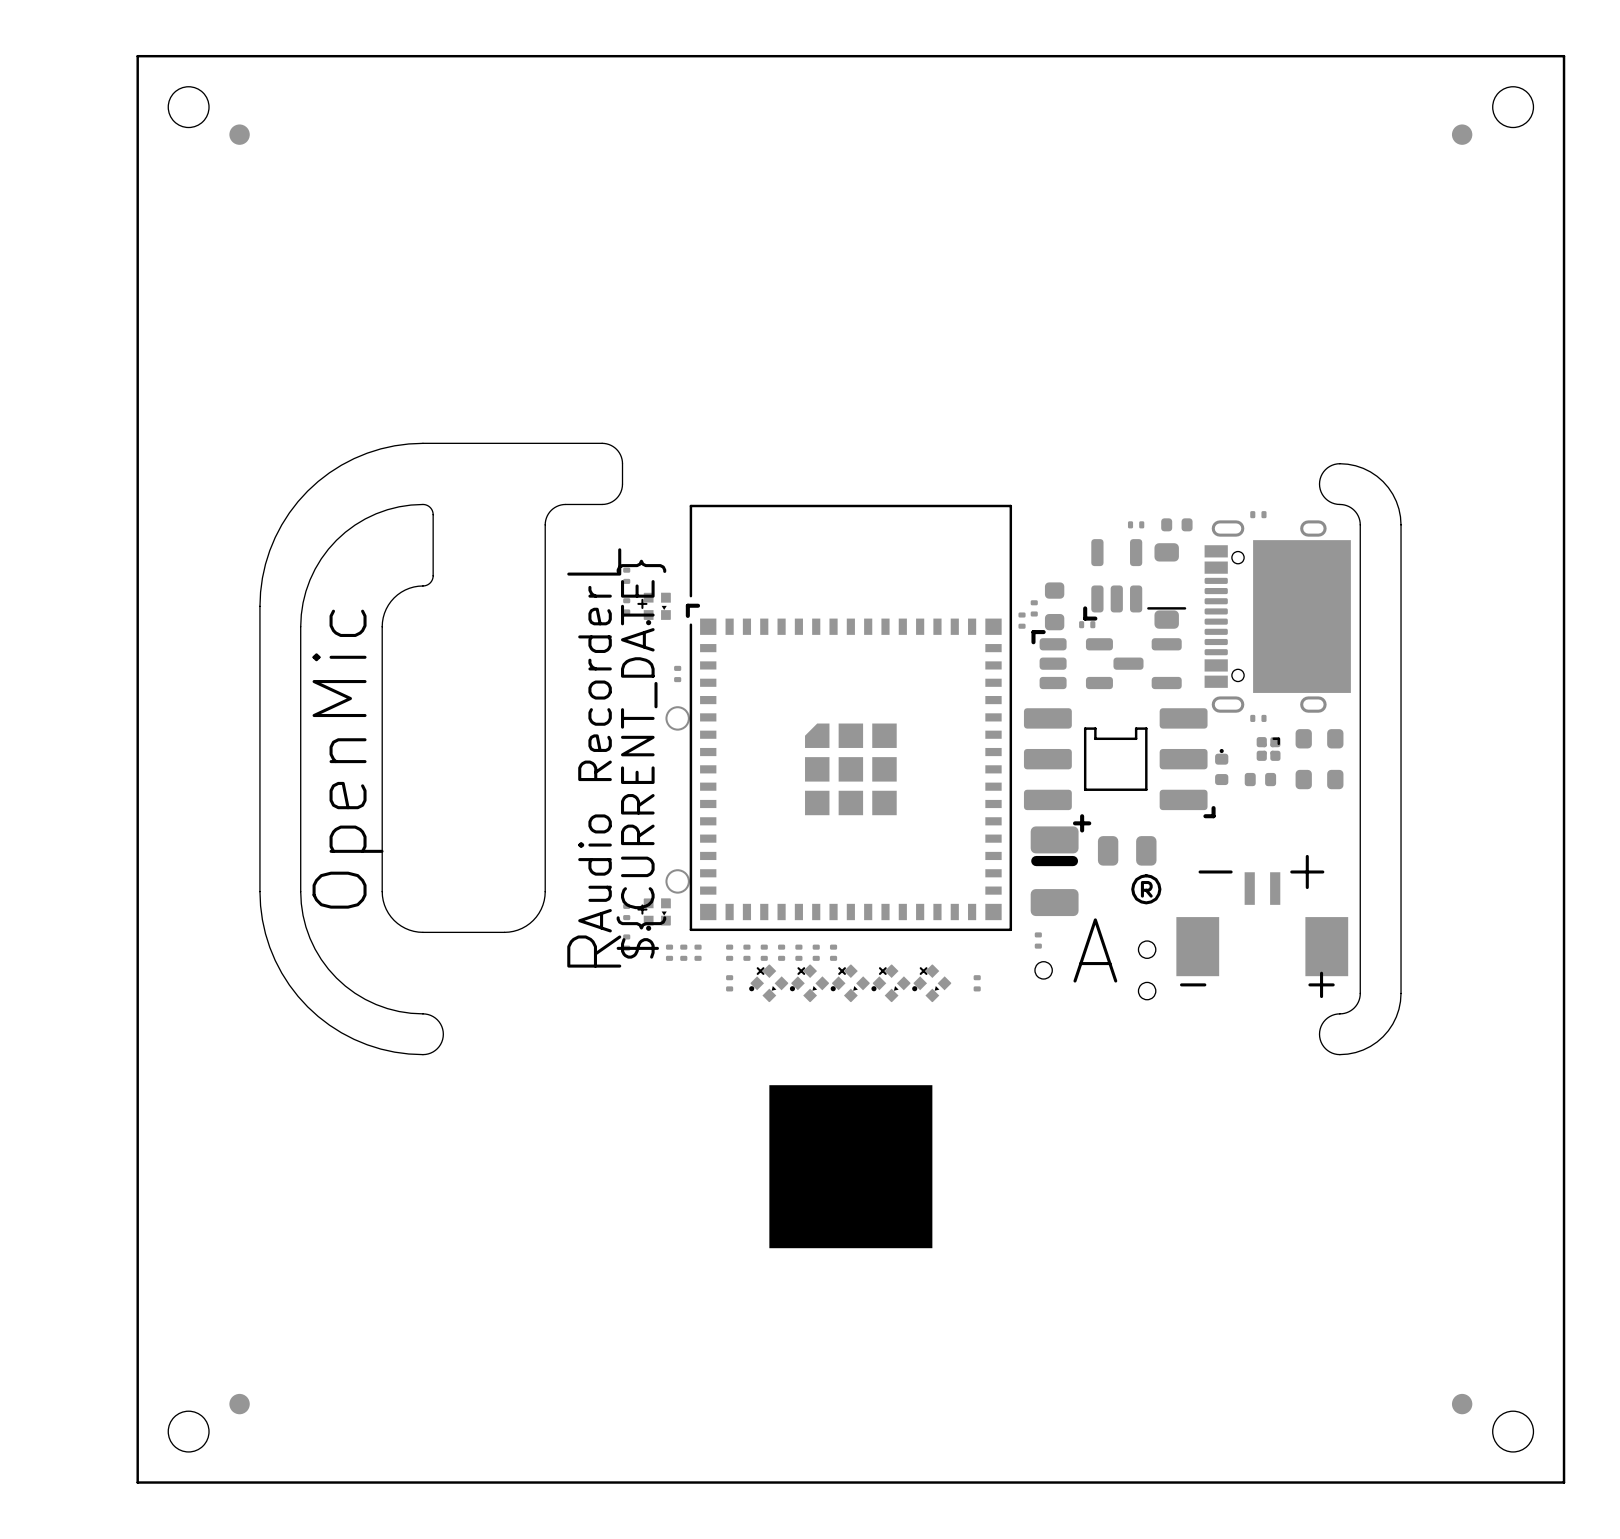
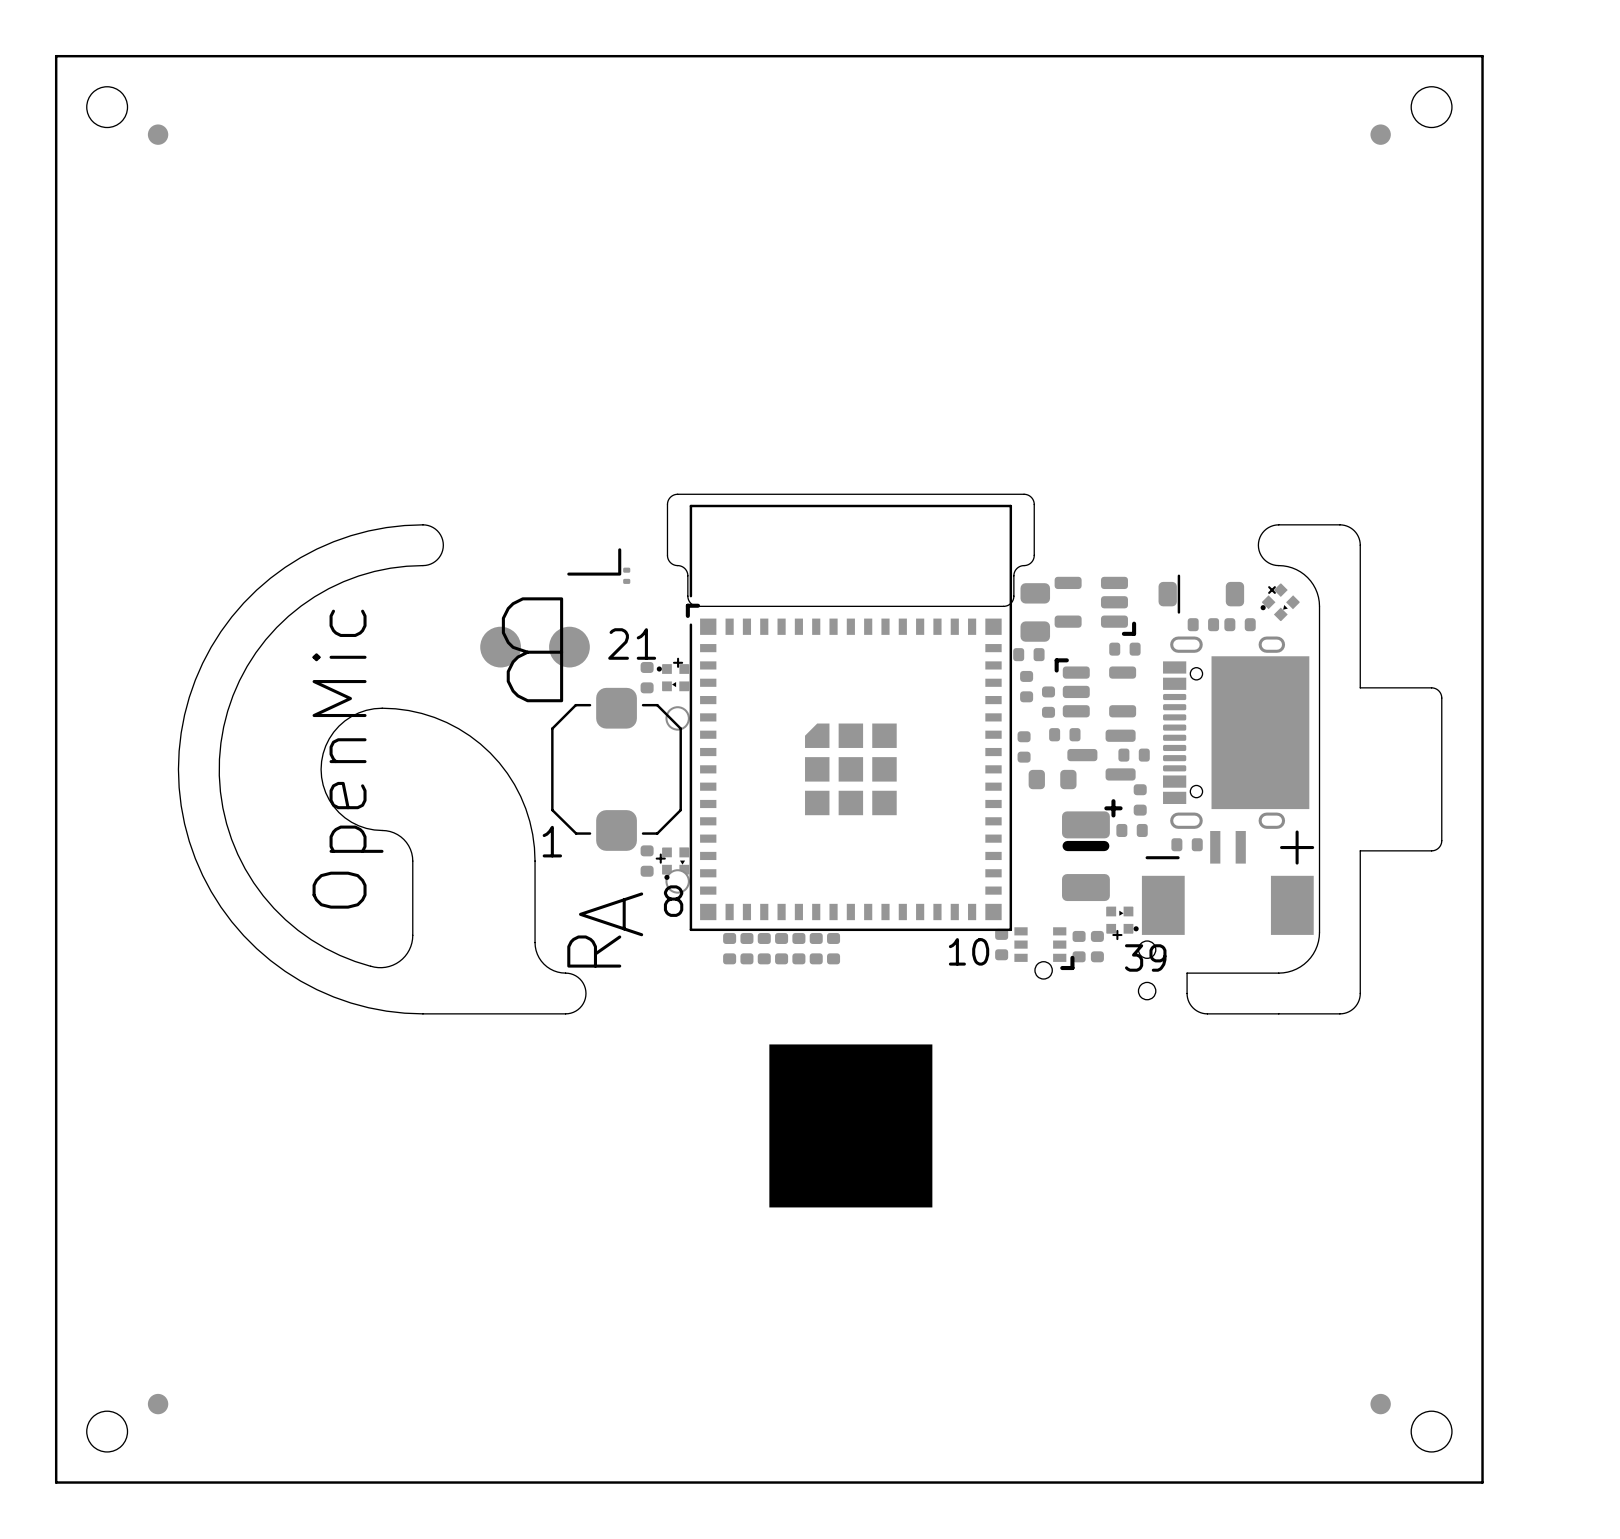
board edge: (422, 443) (604, 443) (616, 449) (620, 454) (622, 463) (621, 489) (614, 500) (604, 504) (558, 505) (551, 510) (545, 520) (544, 896) (542, 905) (536, 917) (529, 923) (517, 930) (504, 932) (413, 931) (401, 926) (394, 920) (388, 913) (383, 900) (382, 622) (386, 609) (397, 594) (409, 588) (426, 585) (432, 579) (431, 509) (424, 504) (399, 506) (376, 513) (355, 525) (328, 549) (315, 569) (305, 591) (300, 626) (300, 891) (305, 927) (315, 949) (328, 969) (355, 993) (387, 1008) (428, 1014) (437, 1019) (442, 1028) (441, 1042) (435, 1050) (422, 1054) (394, 1052) (354, 1039) (329, 1025) (307, 1006) (289, 985) (269, 947) (262, 919) (259, 891) (259, 606) (262, 578) (269, 550) (281, 524) (298, 501) (329, 472) (354, 458) (380, 448) (422, 443) -> (370, 966) (339, 955) (311, 939) (274, 908) (253, 882) (237, 854) (226, 823) (220, 791) (220, 742) (227, 711) (239, 680) (255, 652) (276, 627) (301, 605) (343, 581) (374, 571) (425, 565) (435, 561) (441, 553) (442, 539) (437, 530) (425, 525) (404, 525) (368, 530) (316, 549) (270, 578) (231, 616) (202, 663) (184, 714) (178, 769) (181, 805) (189, 841) (211, 891) (243, 935) (285, 971) (333, 996) (368, 1007) (404, 1013) (565, 1013) (573, 1012) (580, 1007) (585, 996) (584, 985) (578, 977) (550, 969) (541, 961) (537, 954) (535, 942) (535, 861) (532, 834) (520, 796) (507, 773) (480, 743) (458, 728) (434, 717) (395, 708) (366, 710) (345, 720) (329, 738) (321, 761) (321, 777) (325, 792) (338, 812) (358, 825) (397, 834) (406, 842) (411, 853) (412, 935) (410, 946) (402, 959) (392, 965) (381, 967) (370, 966)
board edge: none -> (677, 494) (1025, 494) (1031, 497) (1034, 503) (1034, 556) (1030, 563) (1020, 566) (1015, 570) (1013, 598) (1009, 604) (1005, 606) (696, 606) (690, 603) (688, 598) (686, 570) (681, 566) (671, 563) (667, 556) (667, 503) (671, 496) (677, 494)
part: (1258, 514) -> none
part footprint: [1204, 520, 1351, 713] -> [1260, 583, 1300, 622]
part: (1136, 524) -> none
part: (1176, 524) -> none
board edge: (1360, 545) (1360, 522) (1355, 512) (1346, 505) (1329, 501) (1323, 496) (1320, 489) (1319, 481) (1322, 473) (1327, 467) (1334, 464) (1347, 464) (1363, 468) (1383, 481) (1396, 501) (1401, 524) (1400, 1001) (1396, 1016) (1383, 1036) (1370, 1046) (1355, 1052) (1334, 1053) (1325, 1048) (1321, 1042) (1319, 1031) (1323, 1021) (1332, 1015) (1339, 1013) -> (1360, 545) (1358, 536) (1354, 530) (1348, 526) (1339, 524) (1273, 525) (1264, 530) (1258, 542) (1259, 553) (1266, 561) (1273, 564) (1292, 567) (1307, 577) (1315, 588) (1319, 601) (1319, 932) (1317, 945) (1307, 961) (1300, 966) (1287, 972) (1187, 973) (1188, 1000) (1194, 1009) (1202, 1013) (1339, 1013)
part: (1112, 579) -> none
part rotation: 0° (1166, 585) -> 90° clockwise (1201, 594)
part footprint: [1030, 600, 1038, 617] -> [1020, 583, 1051, 642]
part: (626, 606) -> none
part: (1054, 606) -> none
part: none -> (1095, 606)
part: (654, 608) -> none
part: (1022, 620) -> none
part: (1087, 624) -> none
part: none -> (1203, 624)
part: none -> (1240, 624)
text: none -> 21 (632, 643)
part: none -> (535, 647)
part: none -> (1124, 649)
part: none -> (1028, 654)
part: (1072, 659) -> none
part position: (1147, 663) -> (1101, 755)
part footprint: [674, 665, 682, 683] -> [656, 657, 690, 692]
part: none -> (647, 677)
part: none -> (1026, 686)
part: none -> (1095, 687)
board edge: (1360, 687) (1360, 850) -> (1360, 687) (1432, 687) (1438, 690) (1441, 698) (1440, 845) (1431, 850) (1360, 850)
part: none -> (1048, 702)
part: (1258, 718) -> none
part: none -> (1236, 732)
part: none -> (1064, 734)
part: (1319, 738) -> none
part: none -> (1024, 746)
part: (1268, 748) -> none
part: none -> (1134, 755)
text: Audio Recorder (595, 759) -> none
text: ${CURRENT_DATE} (641, 759) -> none
part: (1119, 763) -> none
part: (1221, 767) -> none
part: none -> (616, 769)
part position: (850, 769) -> (769, 769)
part: none -> (1052, 779)
part: (1260, 779) -> none
part: (1319, 779) -> none
part: none -> (1140, 799)
part: none -> (1132, 830)
text: none -> 1 (552, 841)
part: none -> (1187, 844)
part: none -> (1092, 850)
part: (1127, 850) -> none
part: none -> (647, 861)
part: (1060, 865) -> none
text position: - (1215, 871) -> - (1162, 857)
text position: + (1307, 871) -> + (1297, 847)
text: ® (1146, 889) -> none
text: none -> 8 (673, 901)
part: (626, 911) -> none
part position: (654, 914) -> (672, 863)
part: none -> (1122, 923)
part footprint: [1034, 932, 1042, 949] -> [1014, 927, 1075, 971]
part: (626, 942) -> none
part footprint: [726, 944, 734, 961] -> [723, 932, 737, 965]
part footprint: [743, 944, 751, 961] -> [740, 932, 754, 965]
part footprint: [760, 944, 768, 961] -> [757, 932, 771, 965]
part footprint: [778, 944, 786, 961] -> [775, 932, 789, 965]
part footprint: [795, 944, 803, 961] -> [792, 932, 806, 965]
part footprint: [812, 944, 820, 961] -> [809, 932, 823, 965]
part footprint: [829, 944, 838, 961] -> [827, 932, 841, 965]
part: none -> (1001, 944)
part: none -> (1079, 946)
part: none -> (1097, 946)
text rotation: 0° (1095, 950) -> 90° counterclockwise (611, 914)
text position: A (1095, 950) -> A (611, 914)
text: none -> 10 (969, 951)
part: (669, 952) -> none
part: (683, 952) -> none
part: (698, 952) -> none
part position: (1262, 953) -> (1227, 911)
text: none -> 39 (1145, 957)
part: (729, 983) -> none
part: (768, 983) -> none
part: (809, 983) -> none
part: (850, 983) -> none
part: (890, 983) -> none
part: (931, 983) -> none
part: (977, 983) -> none
text: - (1193, 984) -> none
text: + (1321, 984) -> none
drawing position: (850, 1166) -> (850, 1125)

